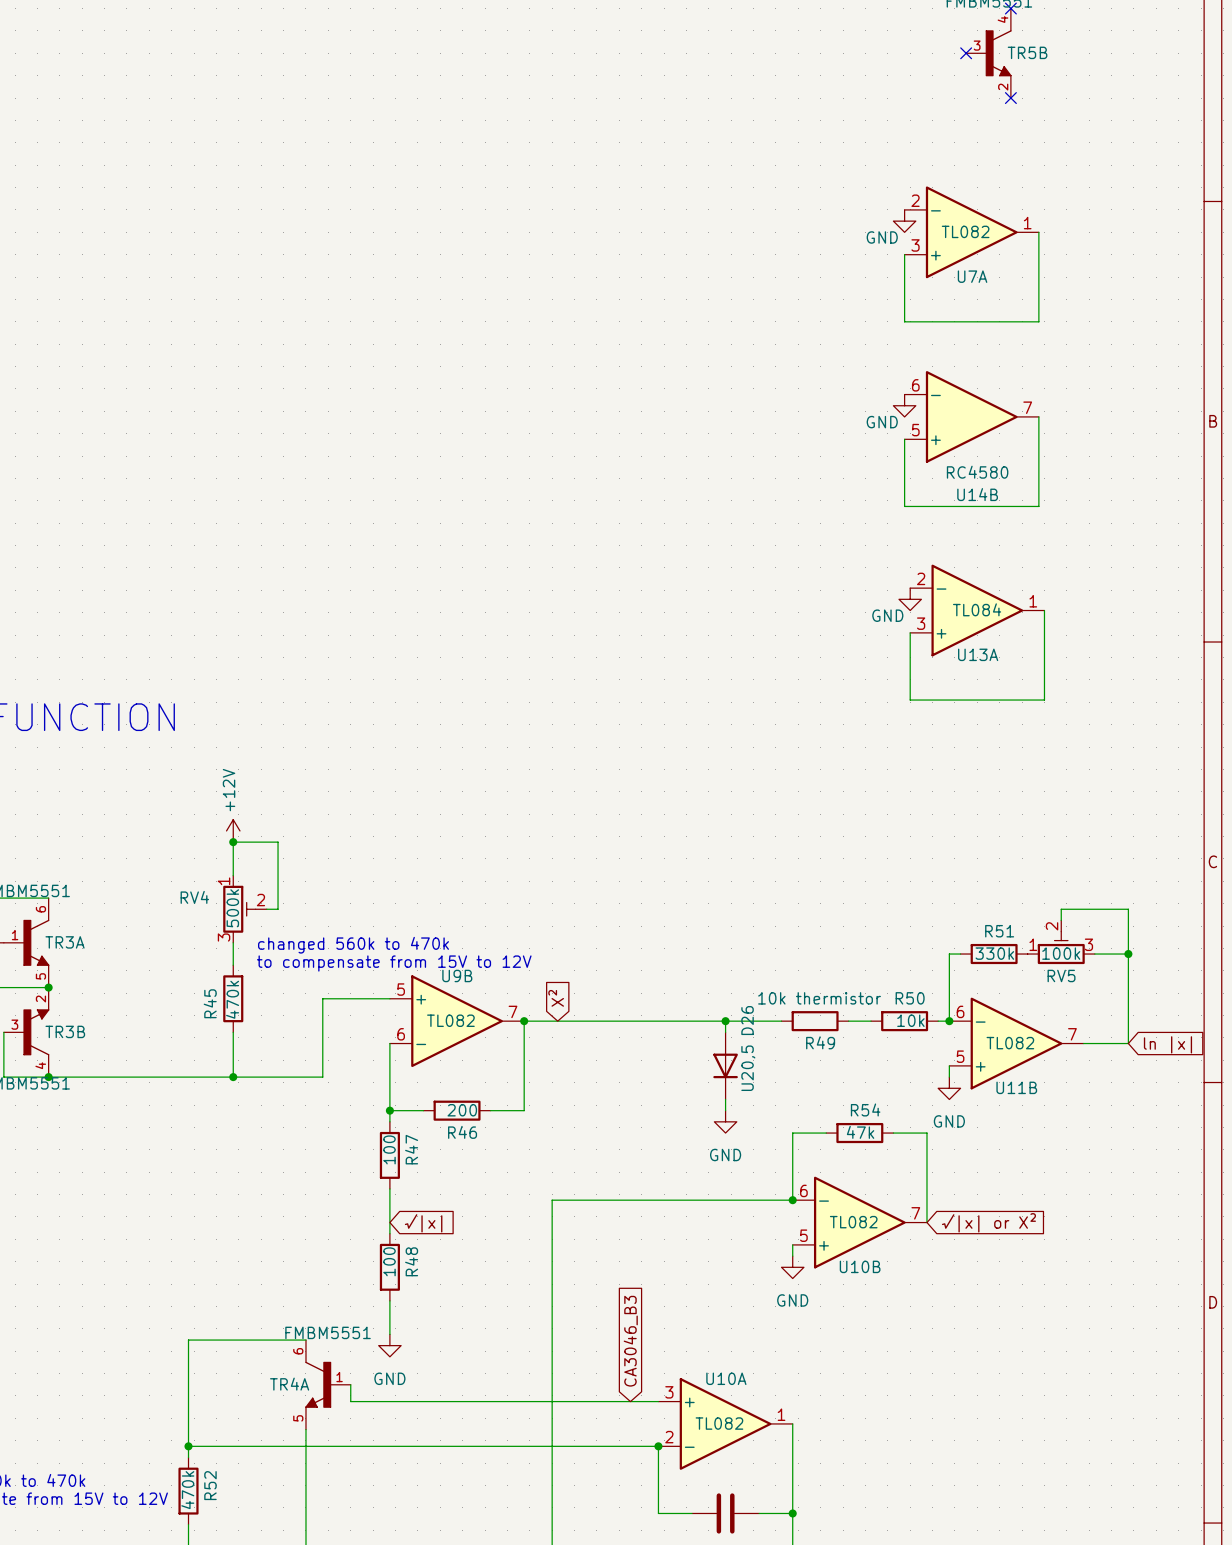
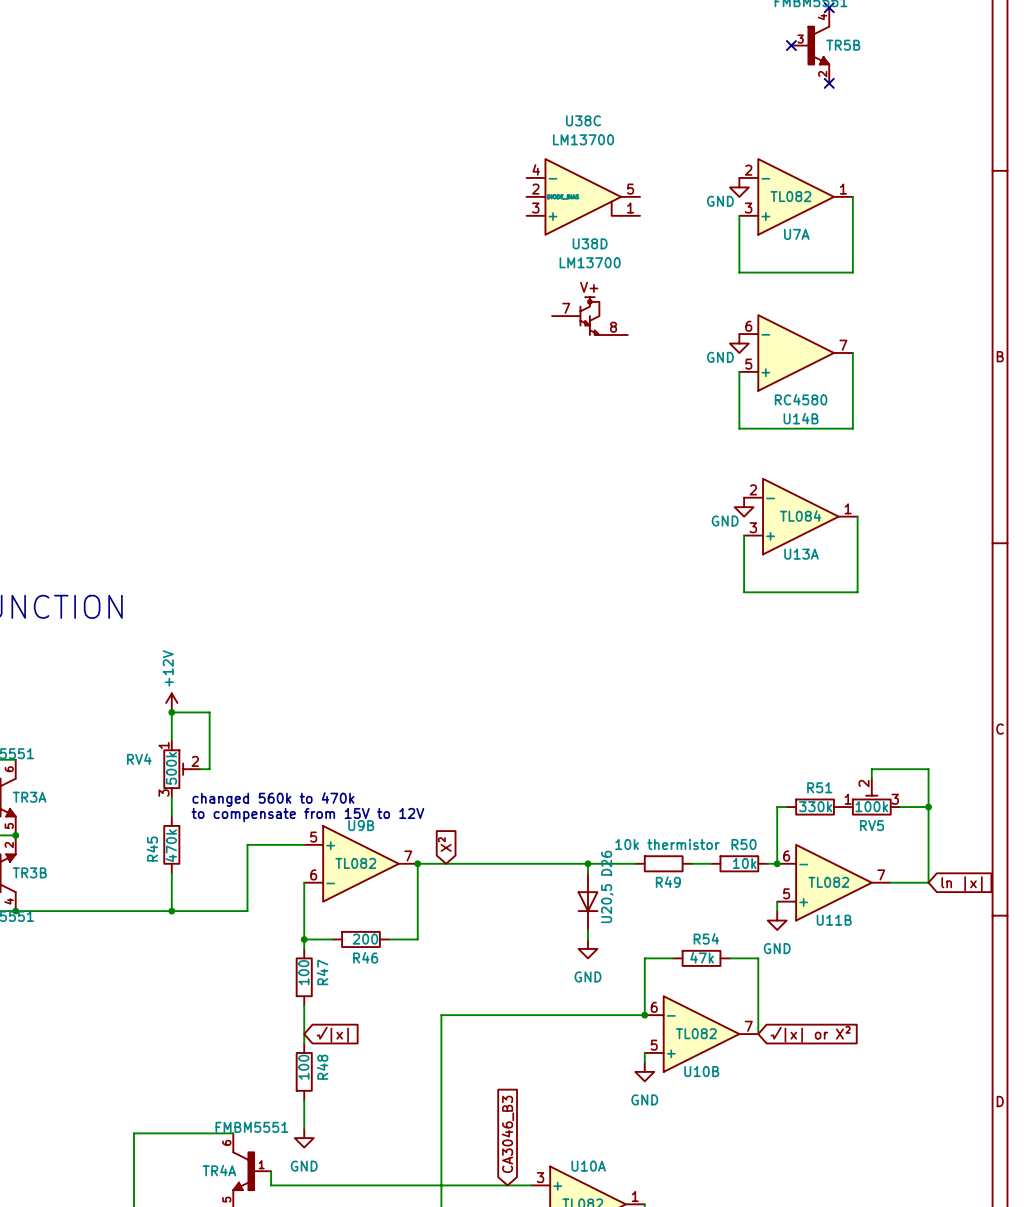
U38C: none -> LM13700 (583, 196)
U38D: none -> LM13700 (589, 316)

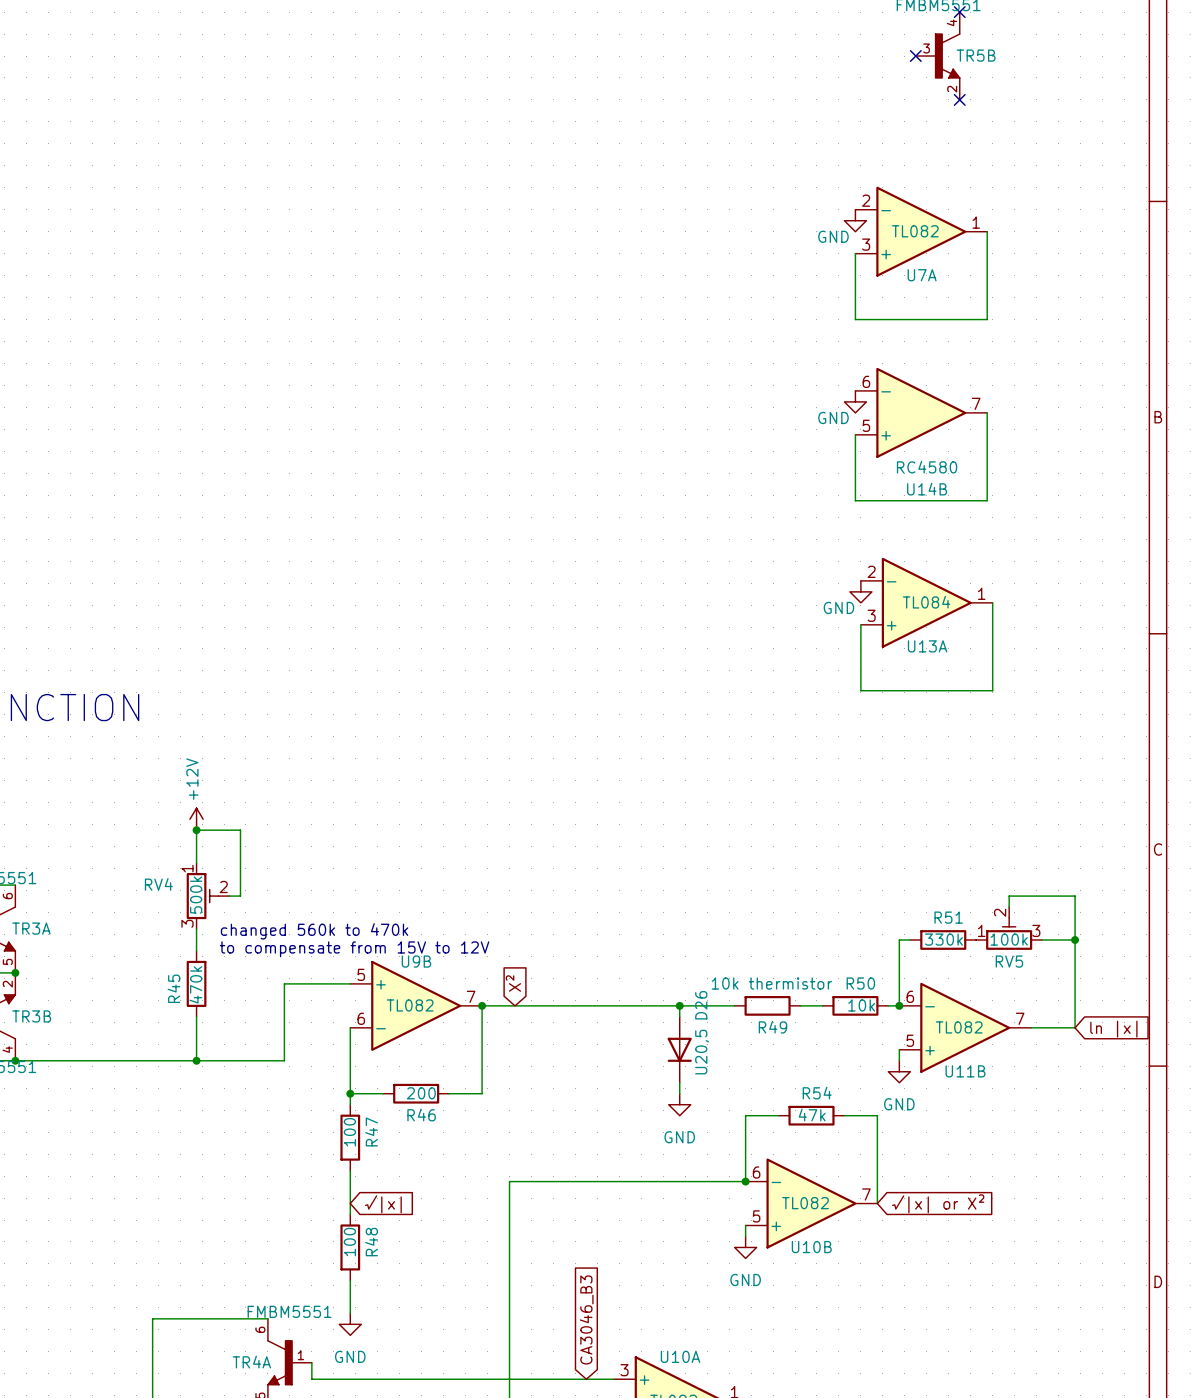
U38C: LM13700 (583, 196) -> none
U38D: LM13700 (589, 316) -> none

